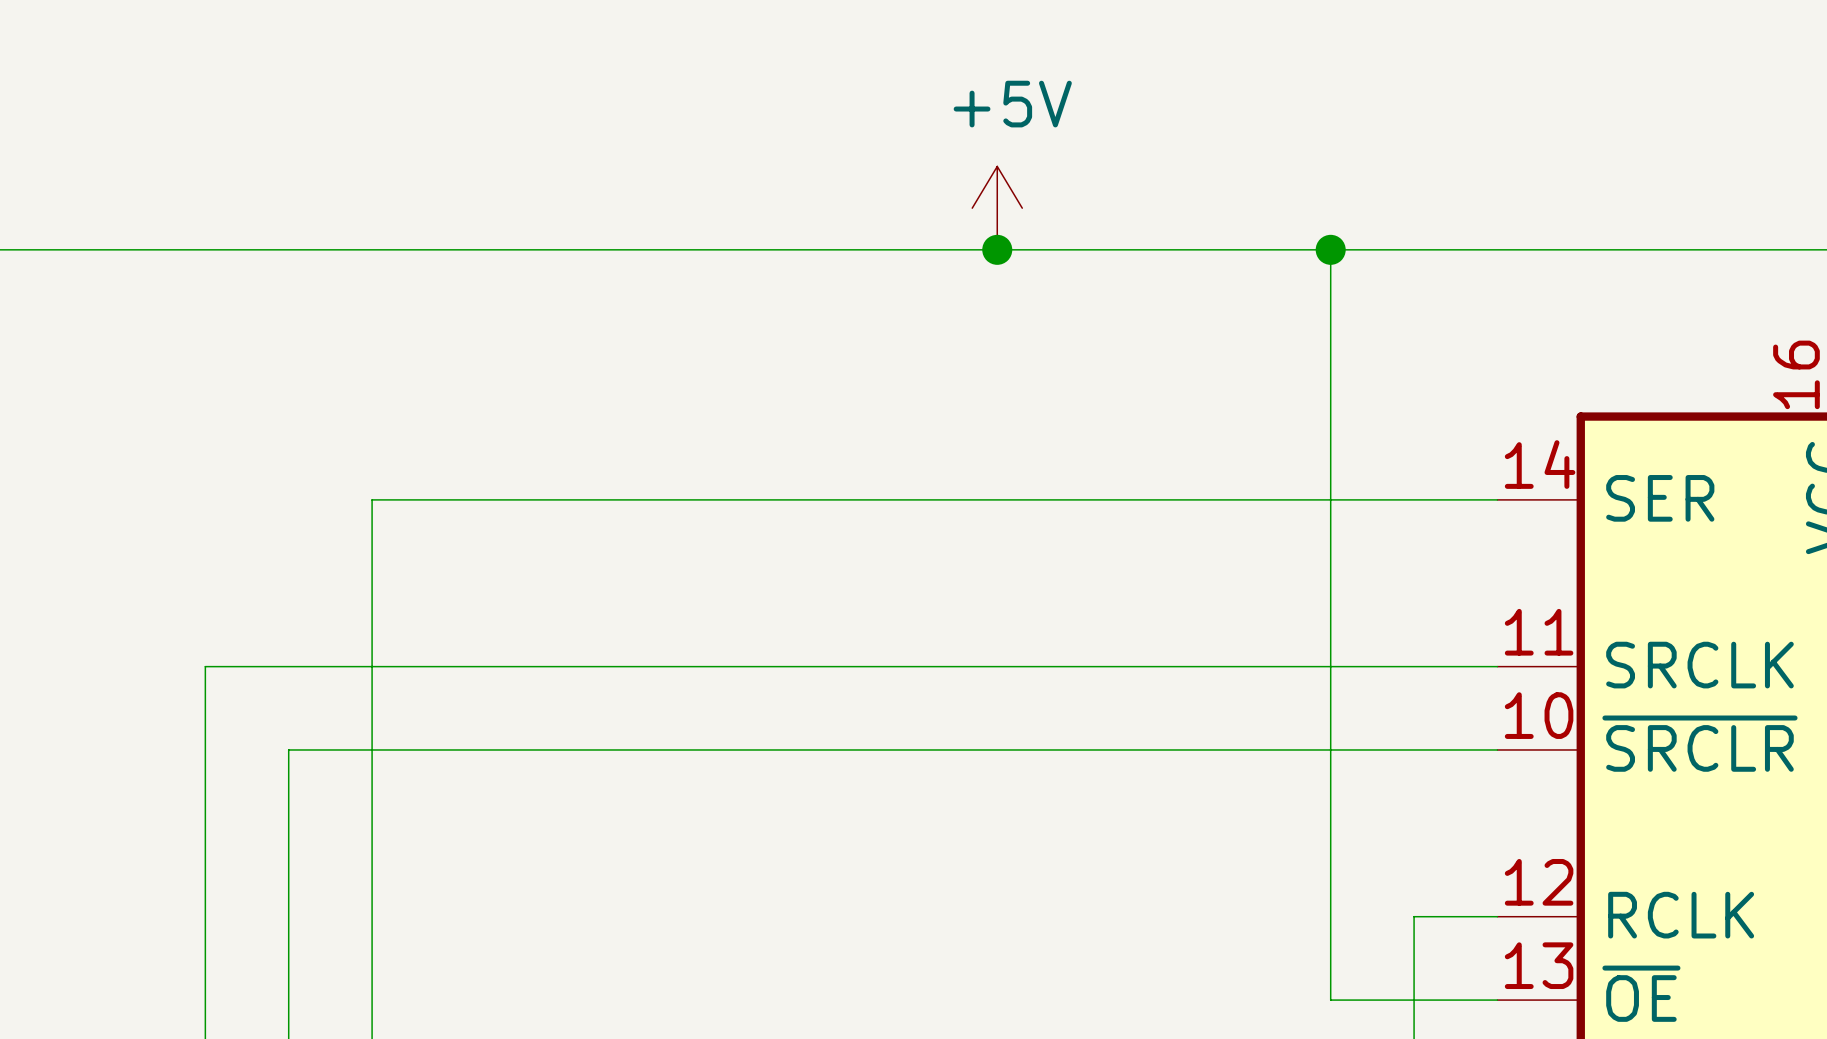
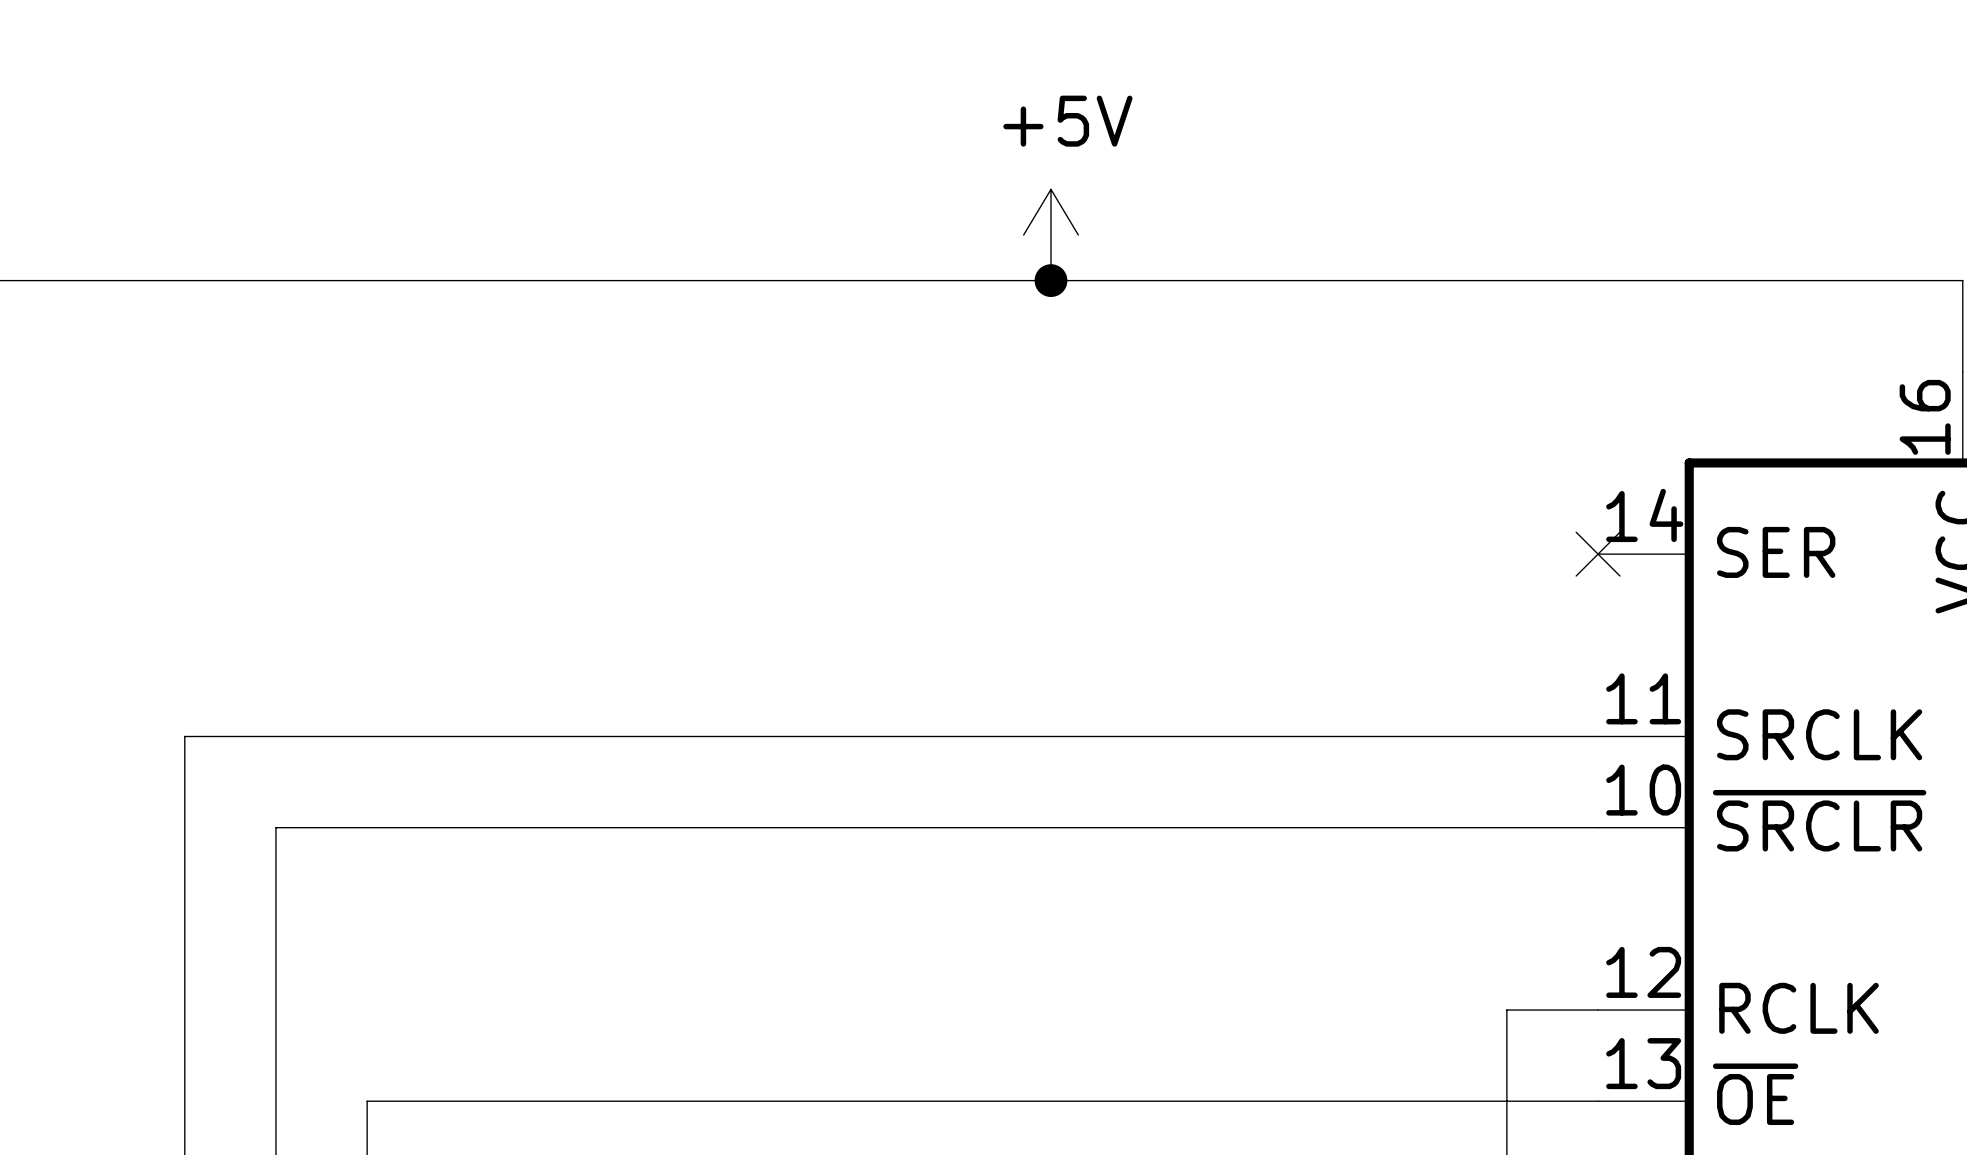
wire: (1330, 249) (1330, 1000) -> none
junction: (1330, 249) -> none
wire: (1497, 499) (372, 499) (372, 1000) -> (1415, 1101) (367, 1101)
no-connect mark: none -> (1598, 554)

